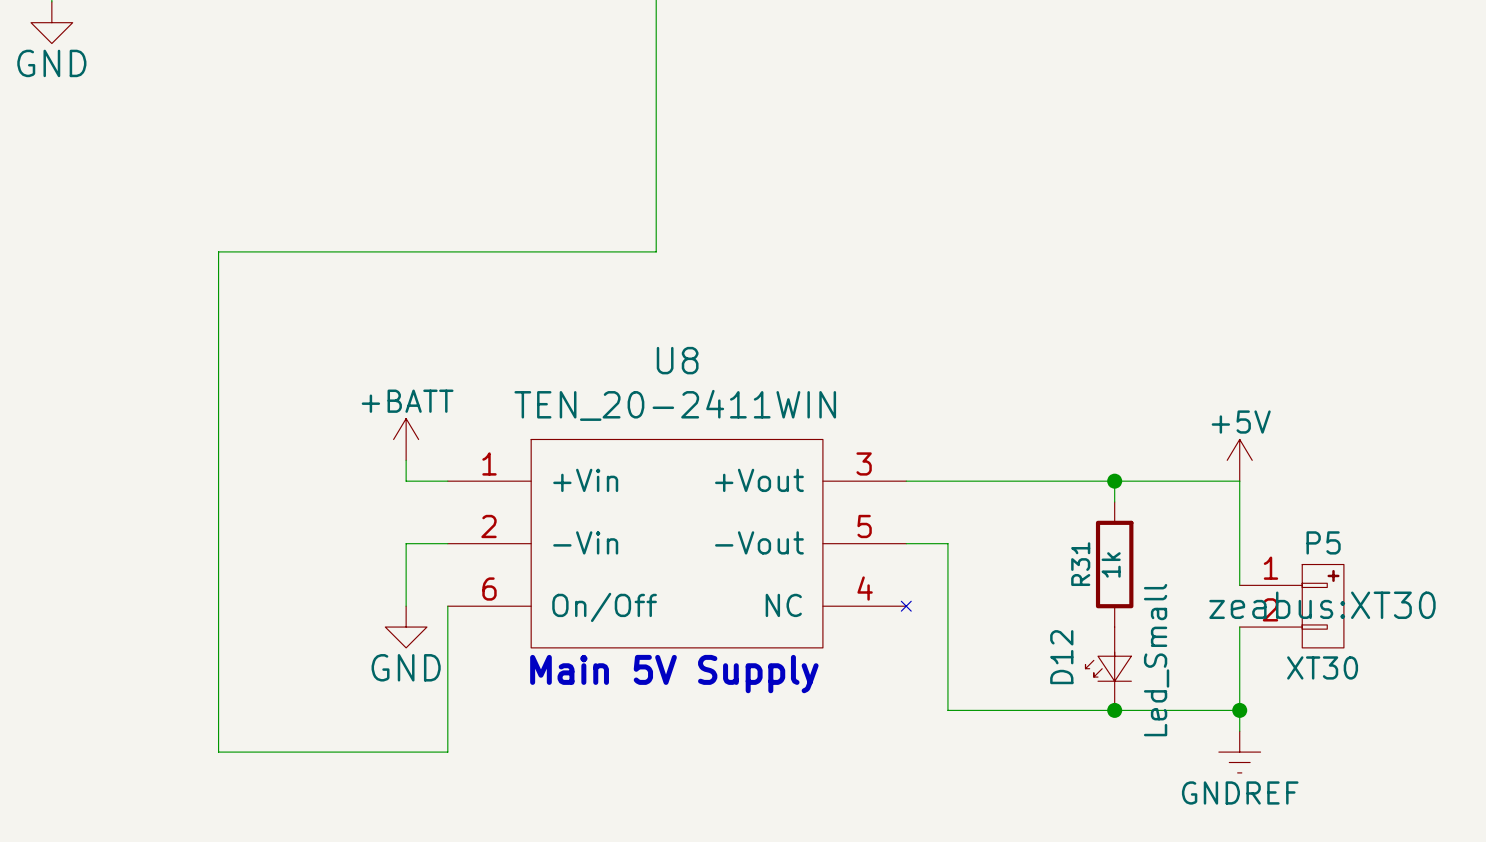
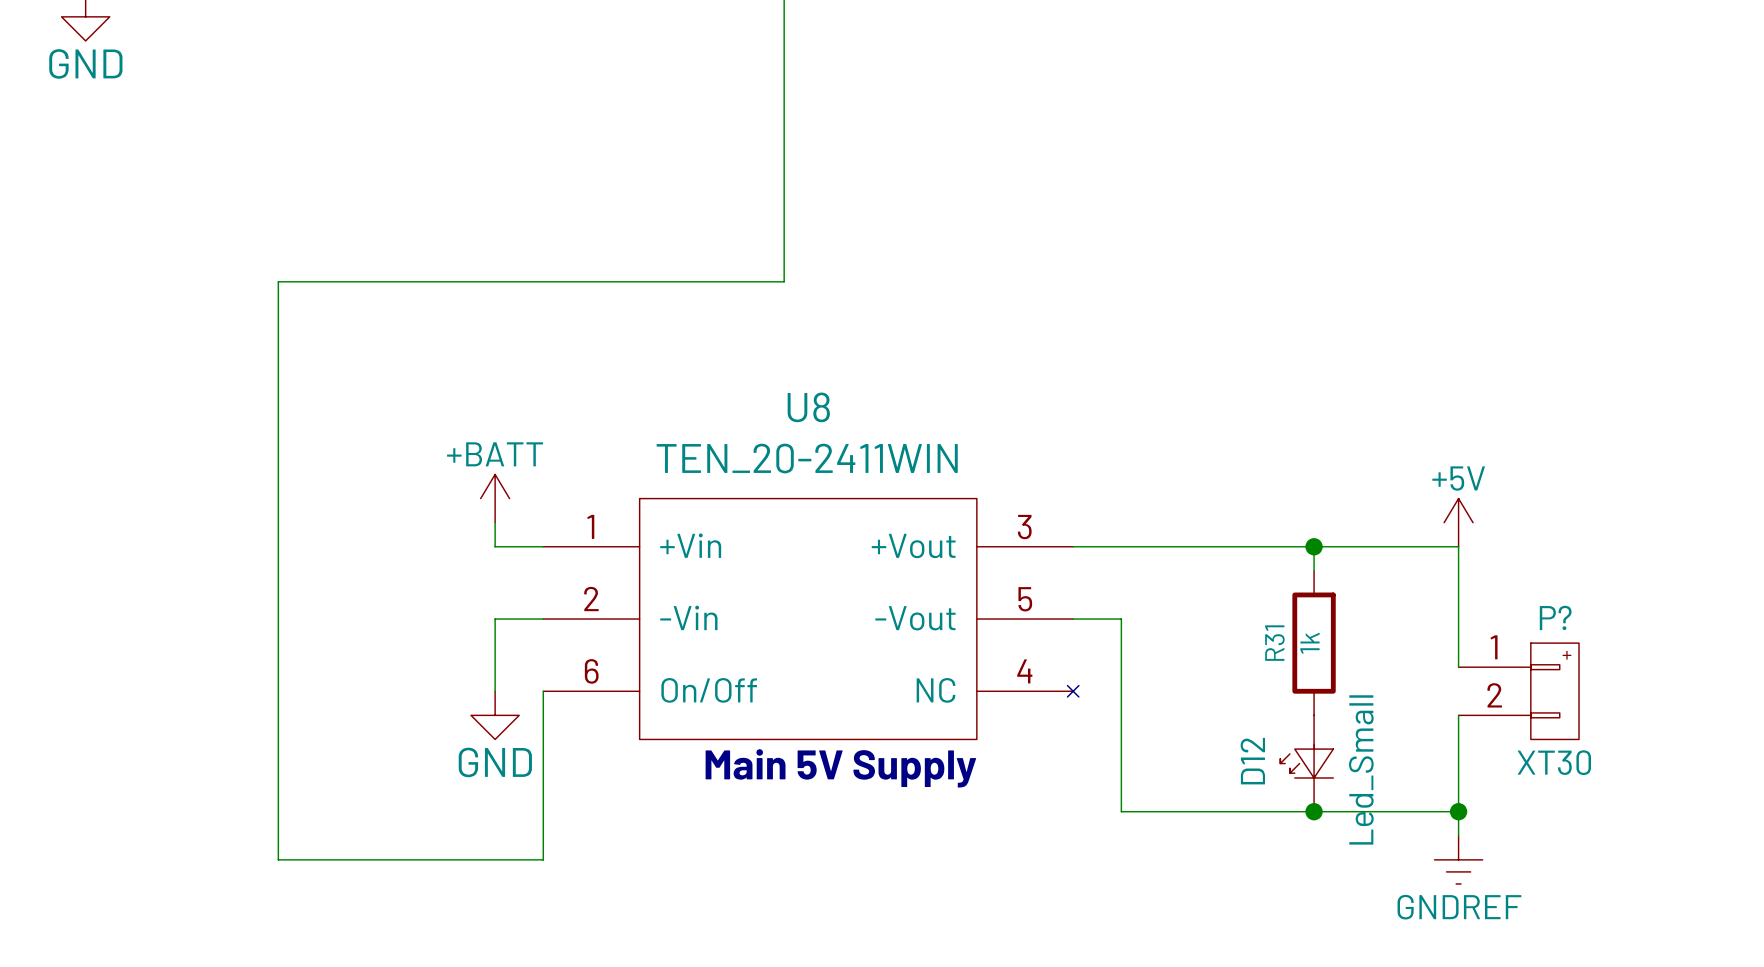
P5 name: P5 (1323, 542) -> P? (1555, 617)
P5 text: zeabus:XT30 (1322, 605) -> none

